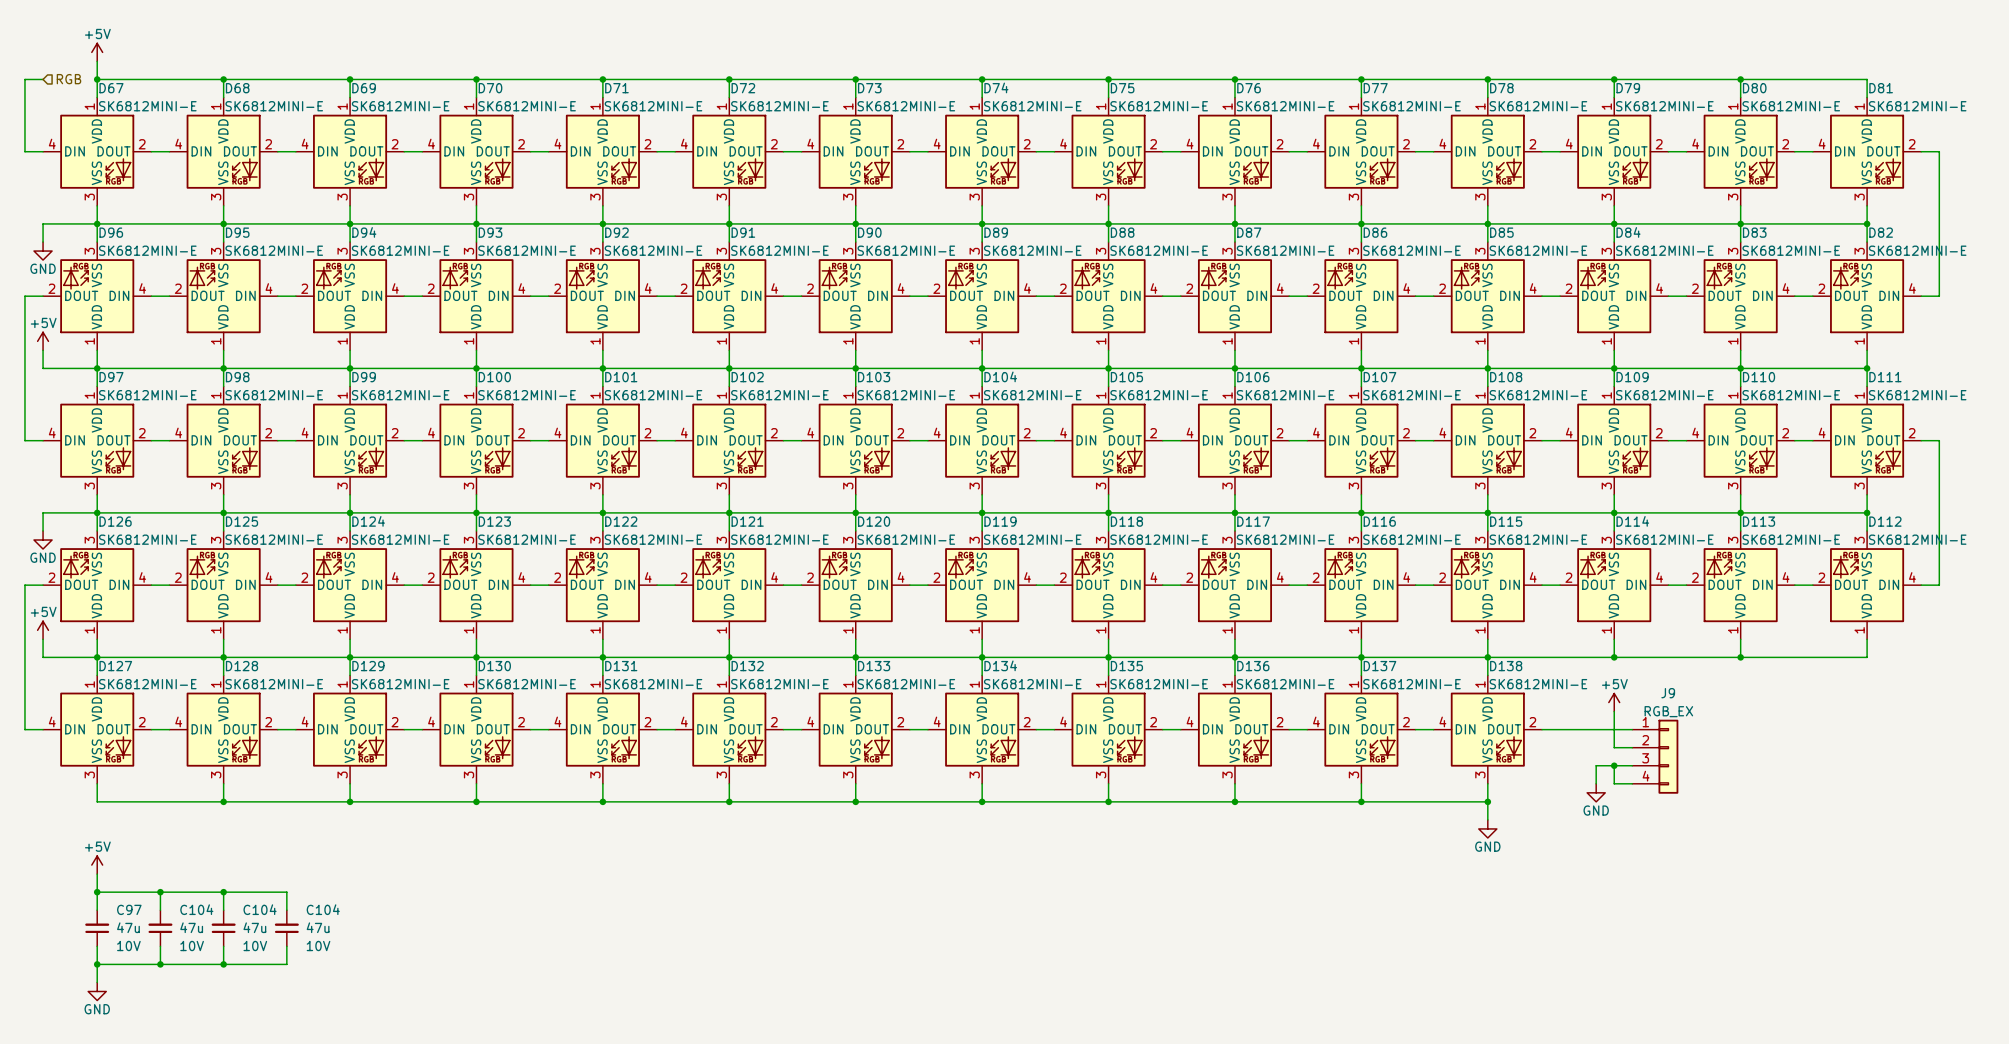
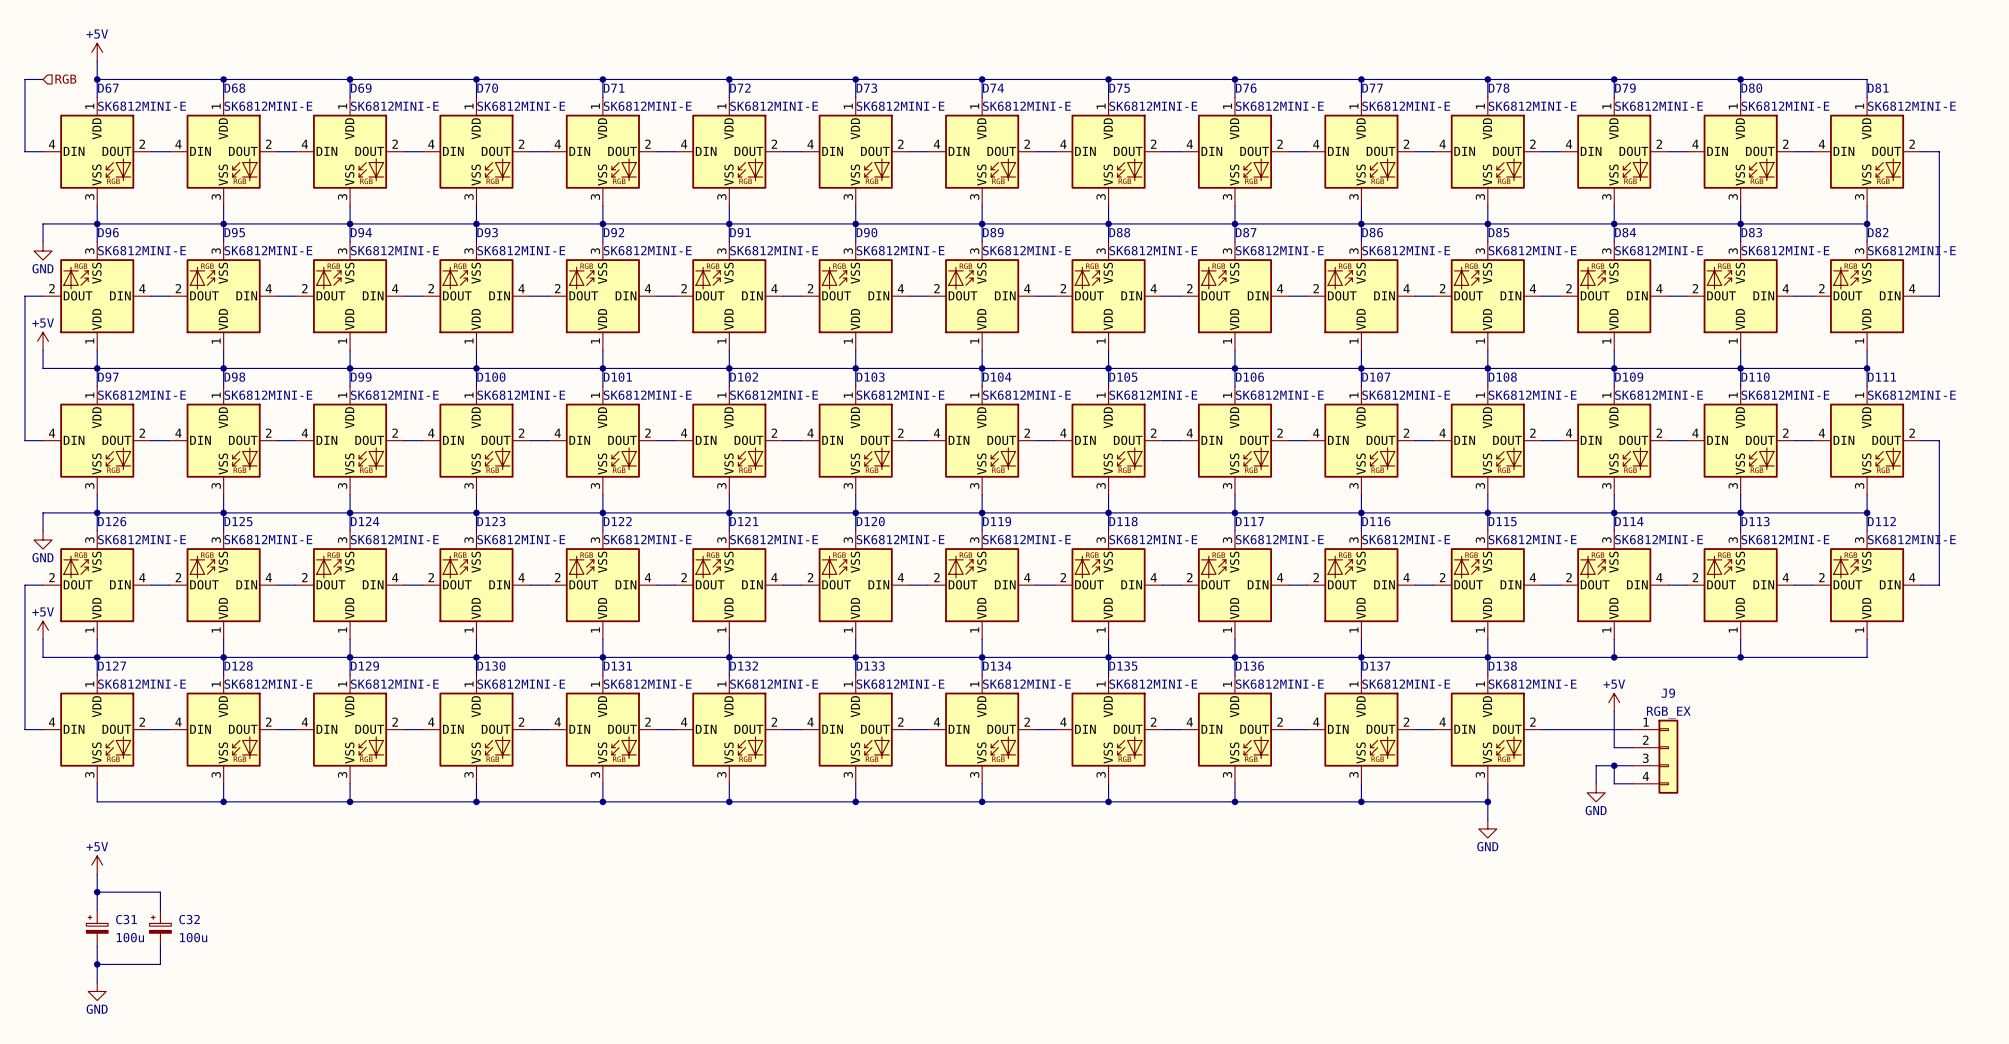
wire: (160, 892) (286, 892) (286, 910) -> none
junction: (160, 892) -> none
wire: (223, 892) (223, 910) -> none
junction: (223, 892) -> none
C97: 47u (97, 928) -> none
C31: none -> 100u (97, 928)
C104: 47u (160, 928) -> none
C32: none -> 100u (160, 928)
C104: 47u (223, 928) -> none
C104: 47u (286, 928) -> none
wire: (223, 946) (223, 964) -> none
wire: (286, 946) (286, 964) (160, 964) -> none
junction: (160, 964) -> none
junction: (223, 964) -> none

